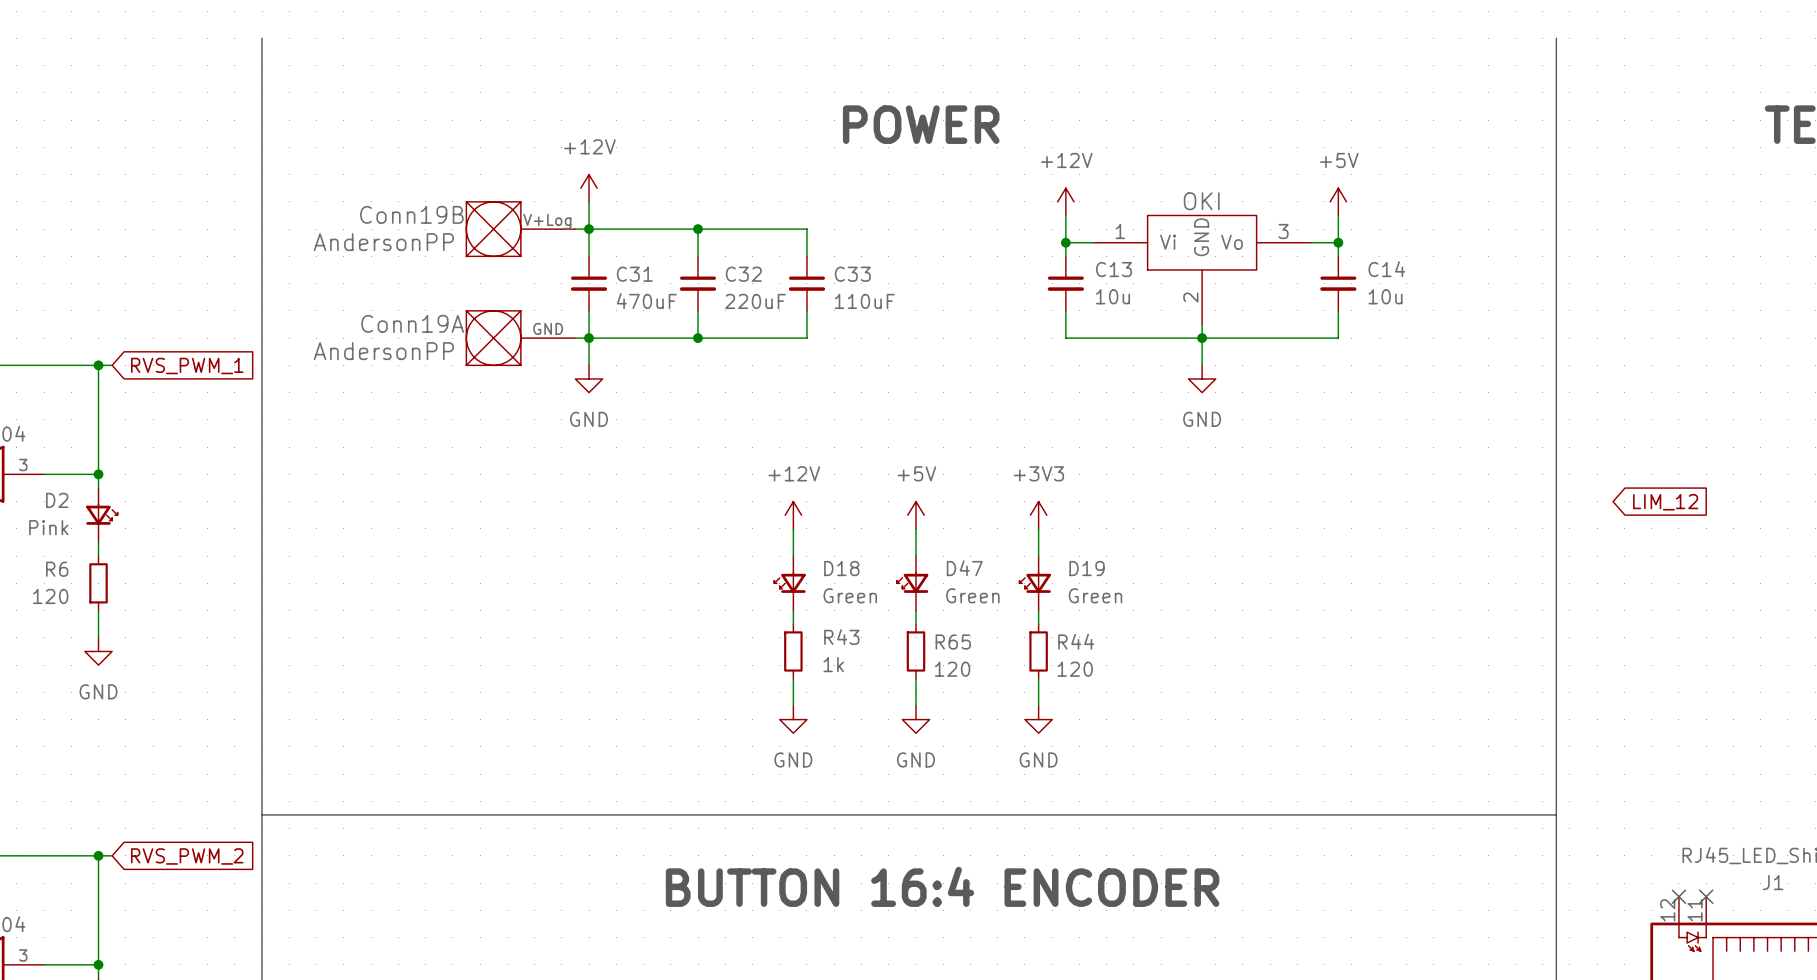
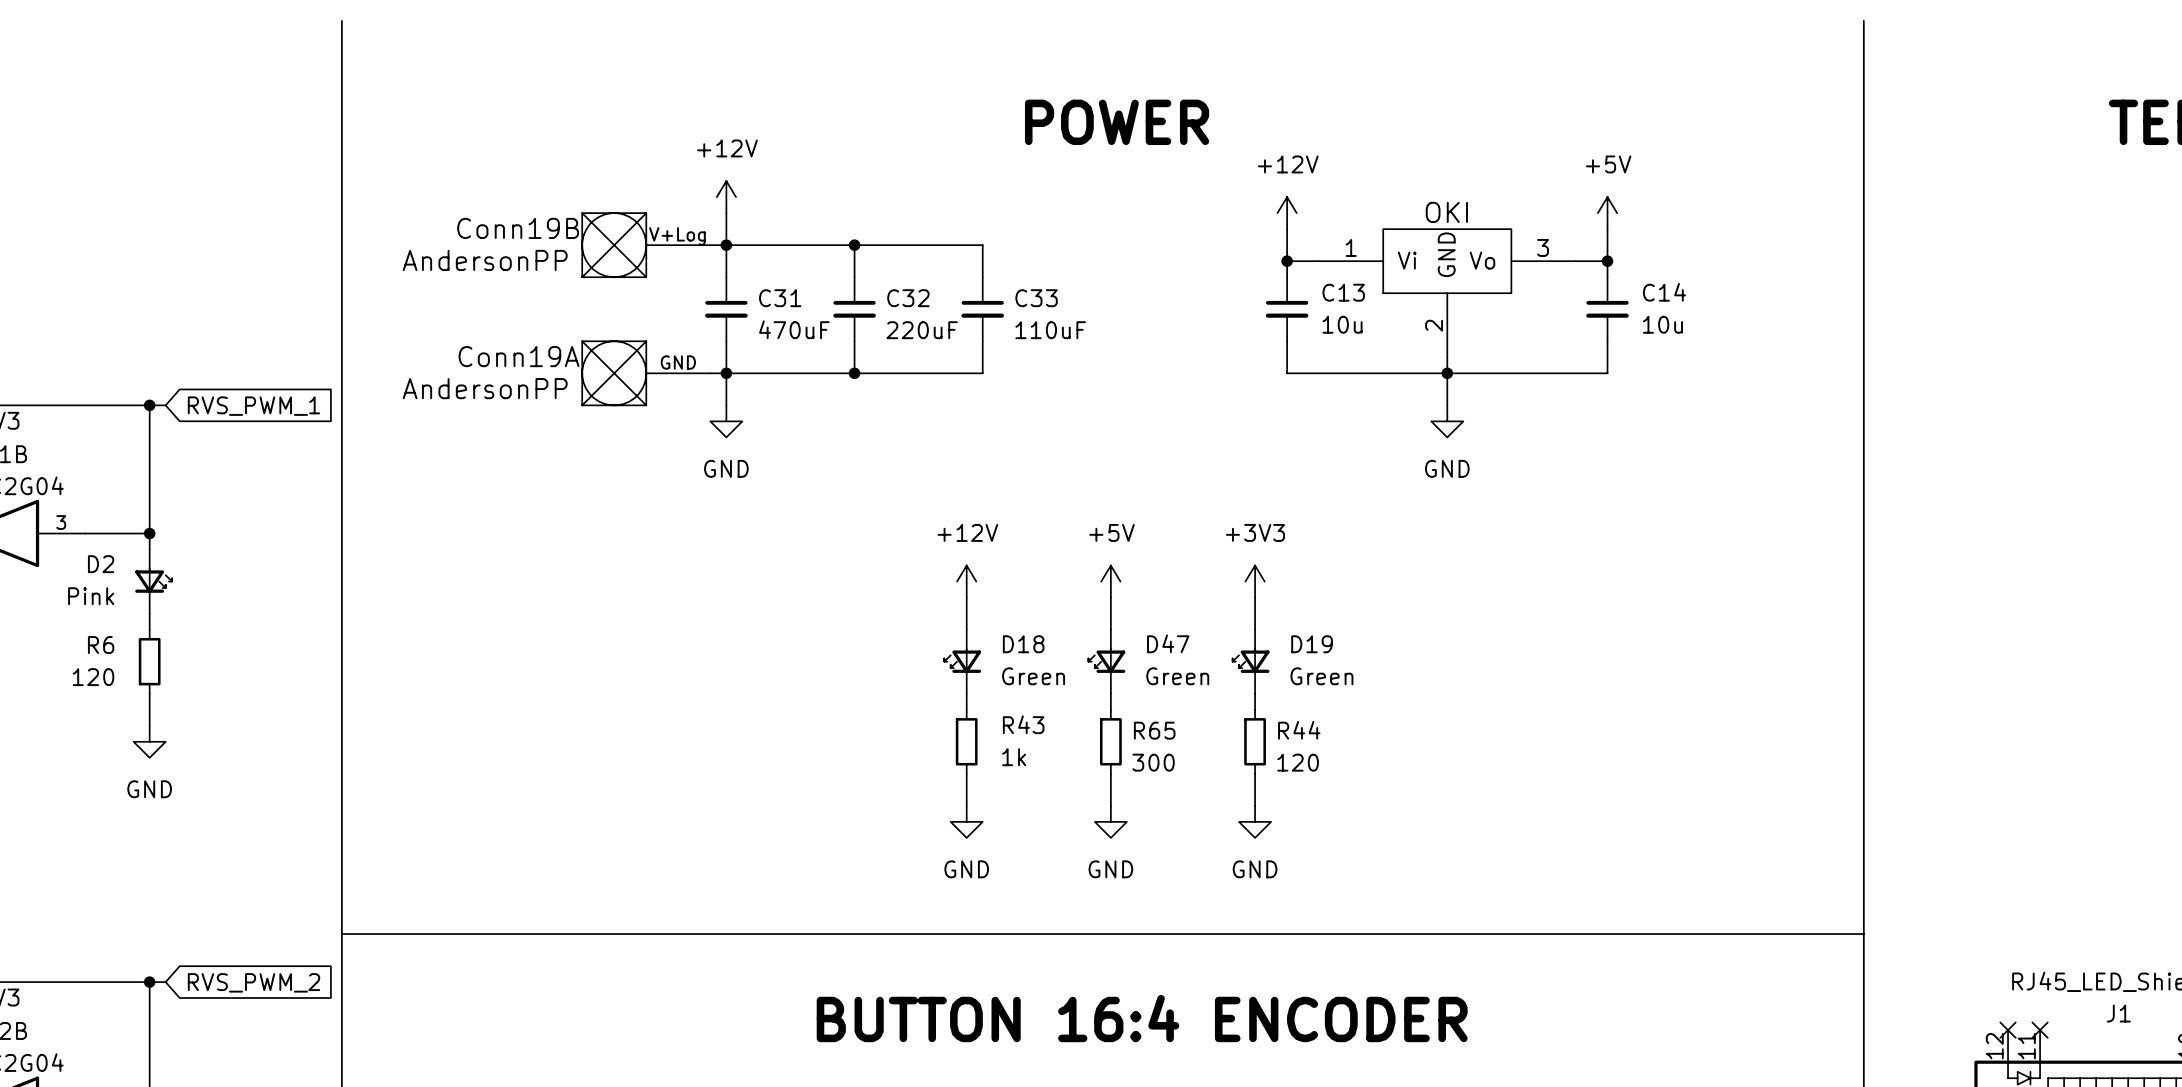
global label: LIM_12 (1665, 502) -> none
R65 value: 120 (952, 669) -> 300 (1153, 762)

